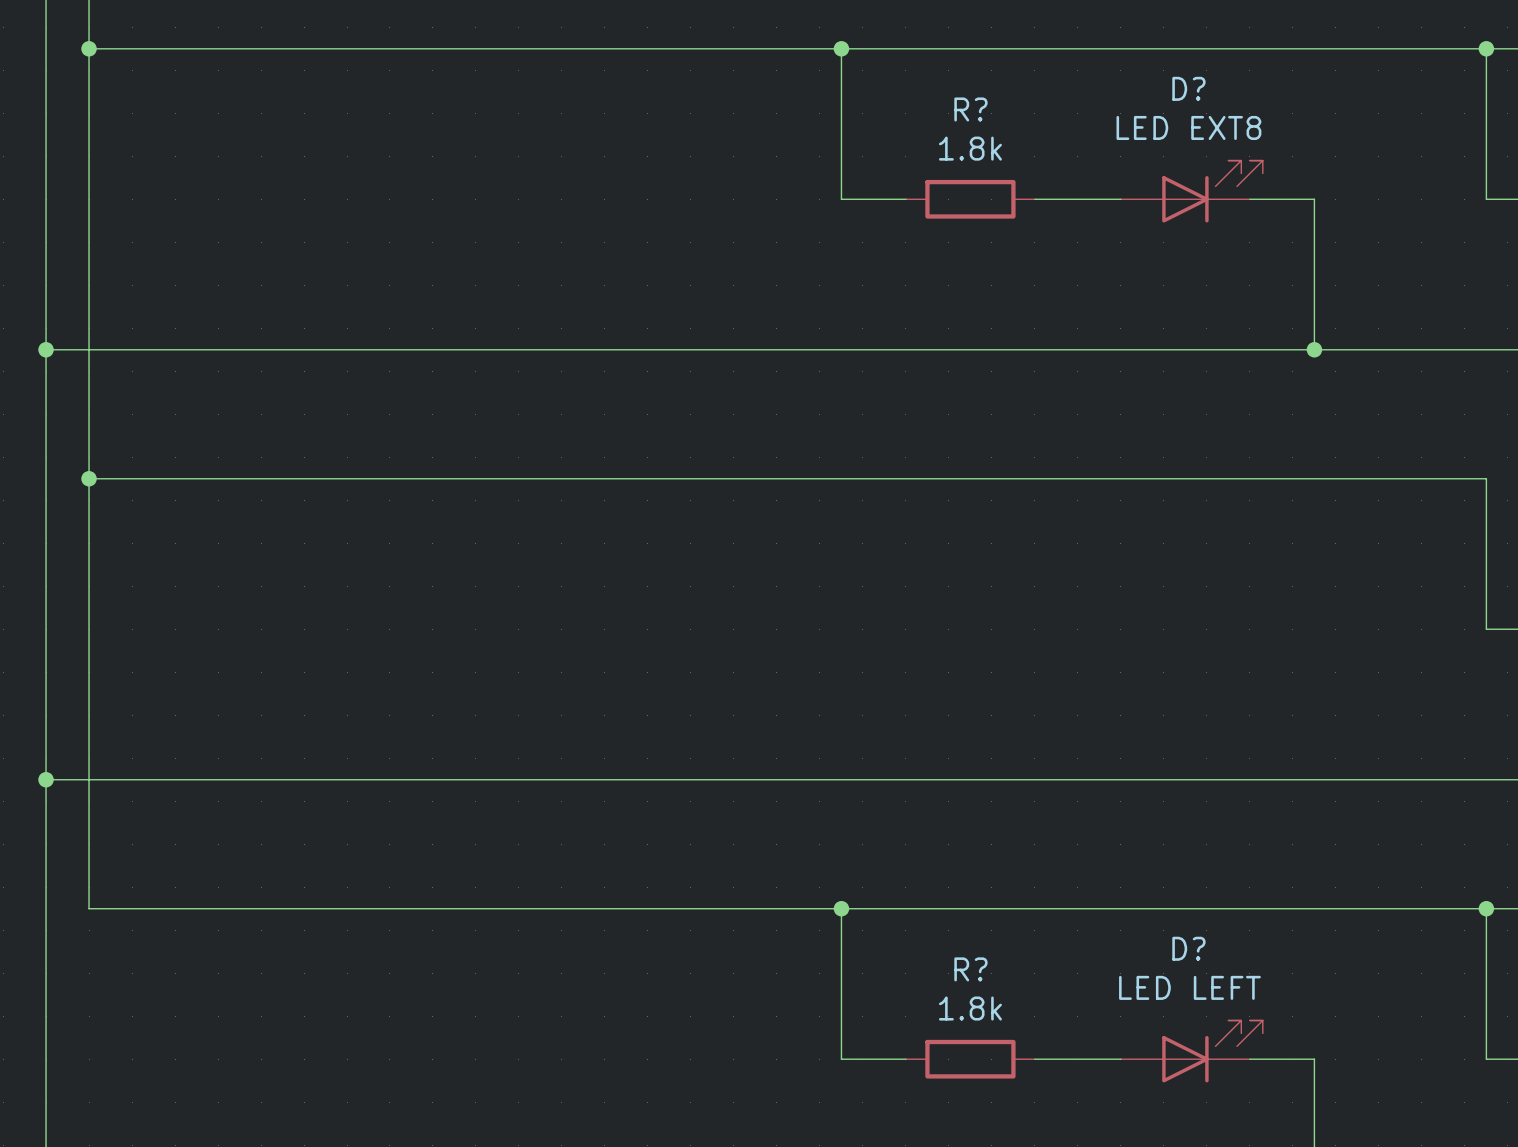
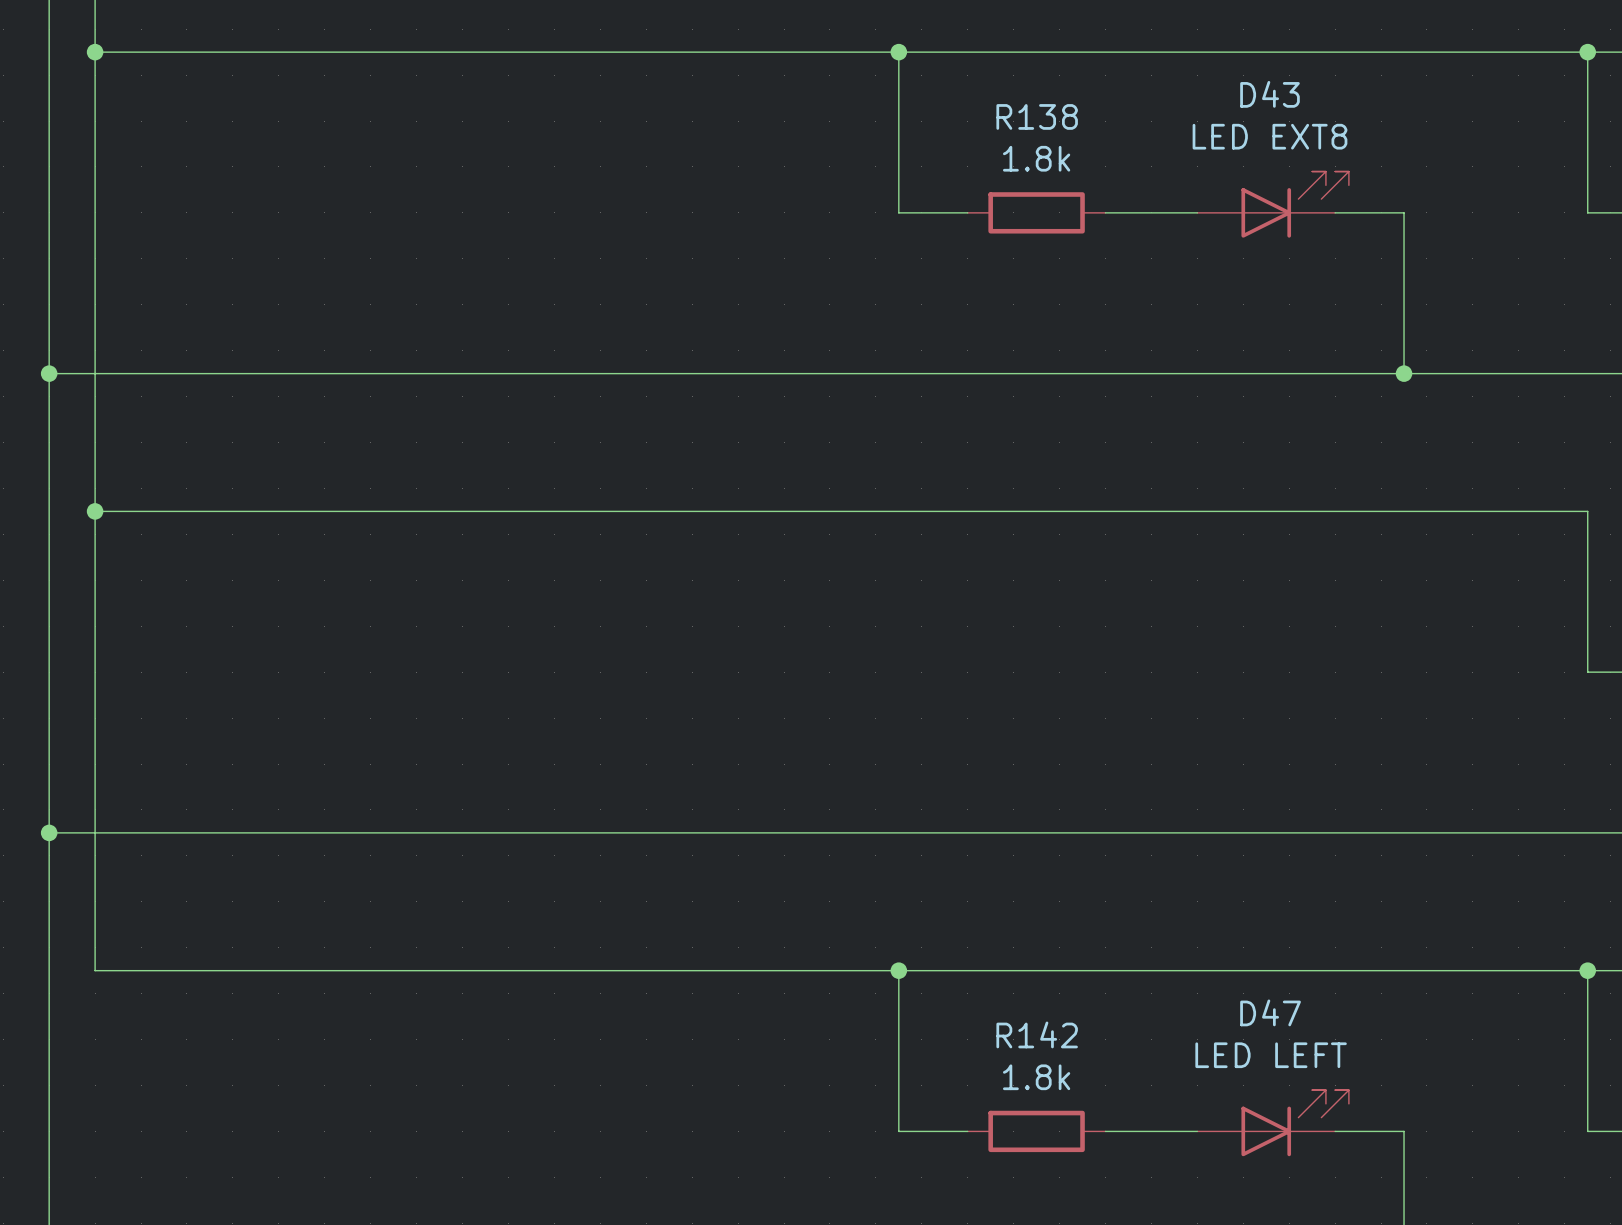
D? name: D? (1188, 88) -> D43 (1269, 94)
R? name: R? (970, 109) -> R138 (1037, 116)
D? name: D? (1188, 948) -> D47 (1270, 1012)
R? name: R? (970, 969) -> R142 (1037, 1034)

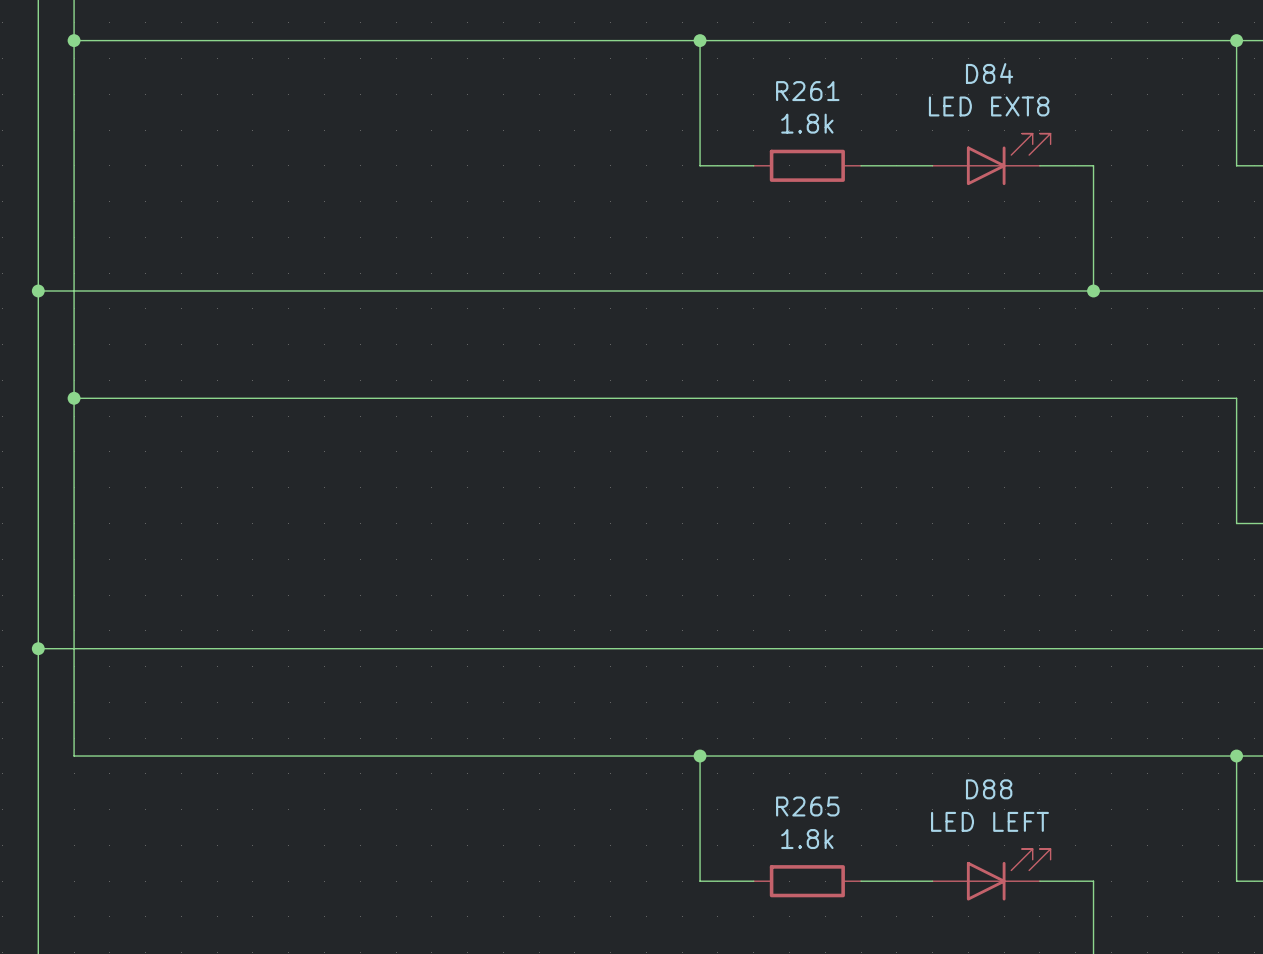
D43 name: D43 (1269, 94) -> D84 (989, 73)
R138 name: R138 (1037, 116) -> R261 (807, 91)
D47 name: D47 (1270, 1012) -> D88 (989, 789)
R142 name: R142 (1037, 1034) -> R265 (807, 806)

